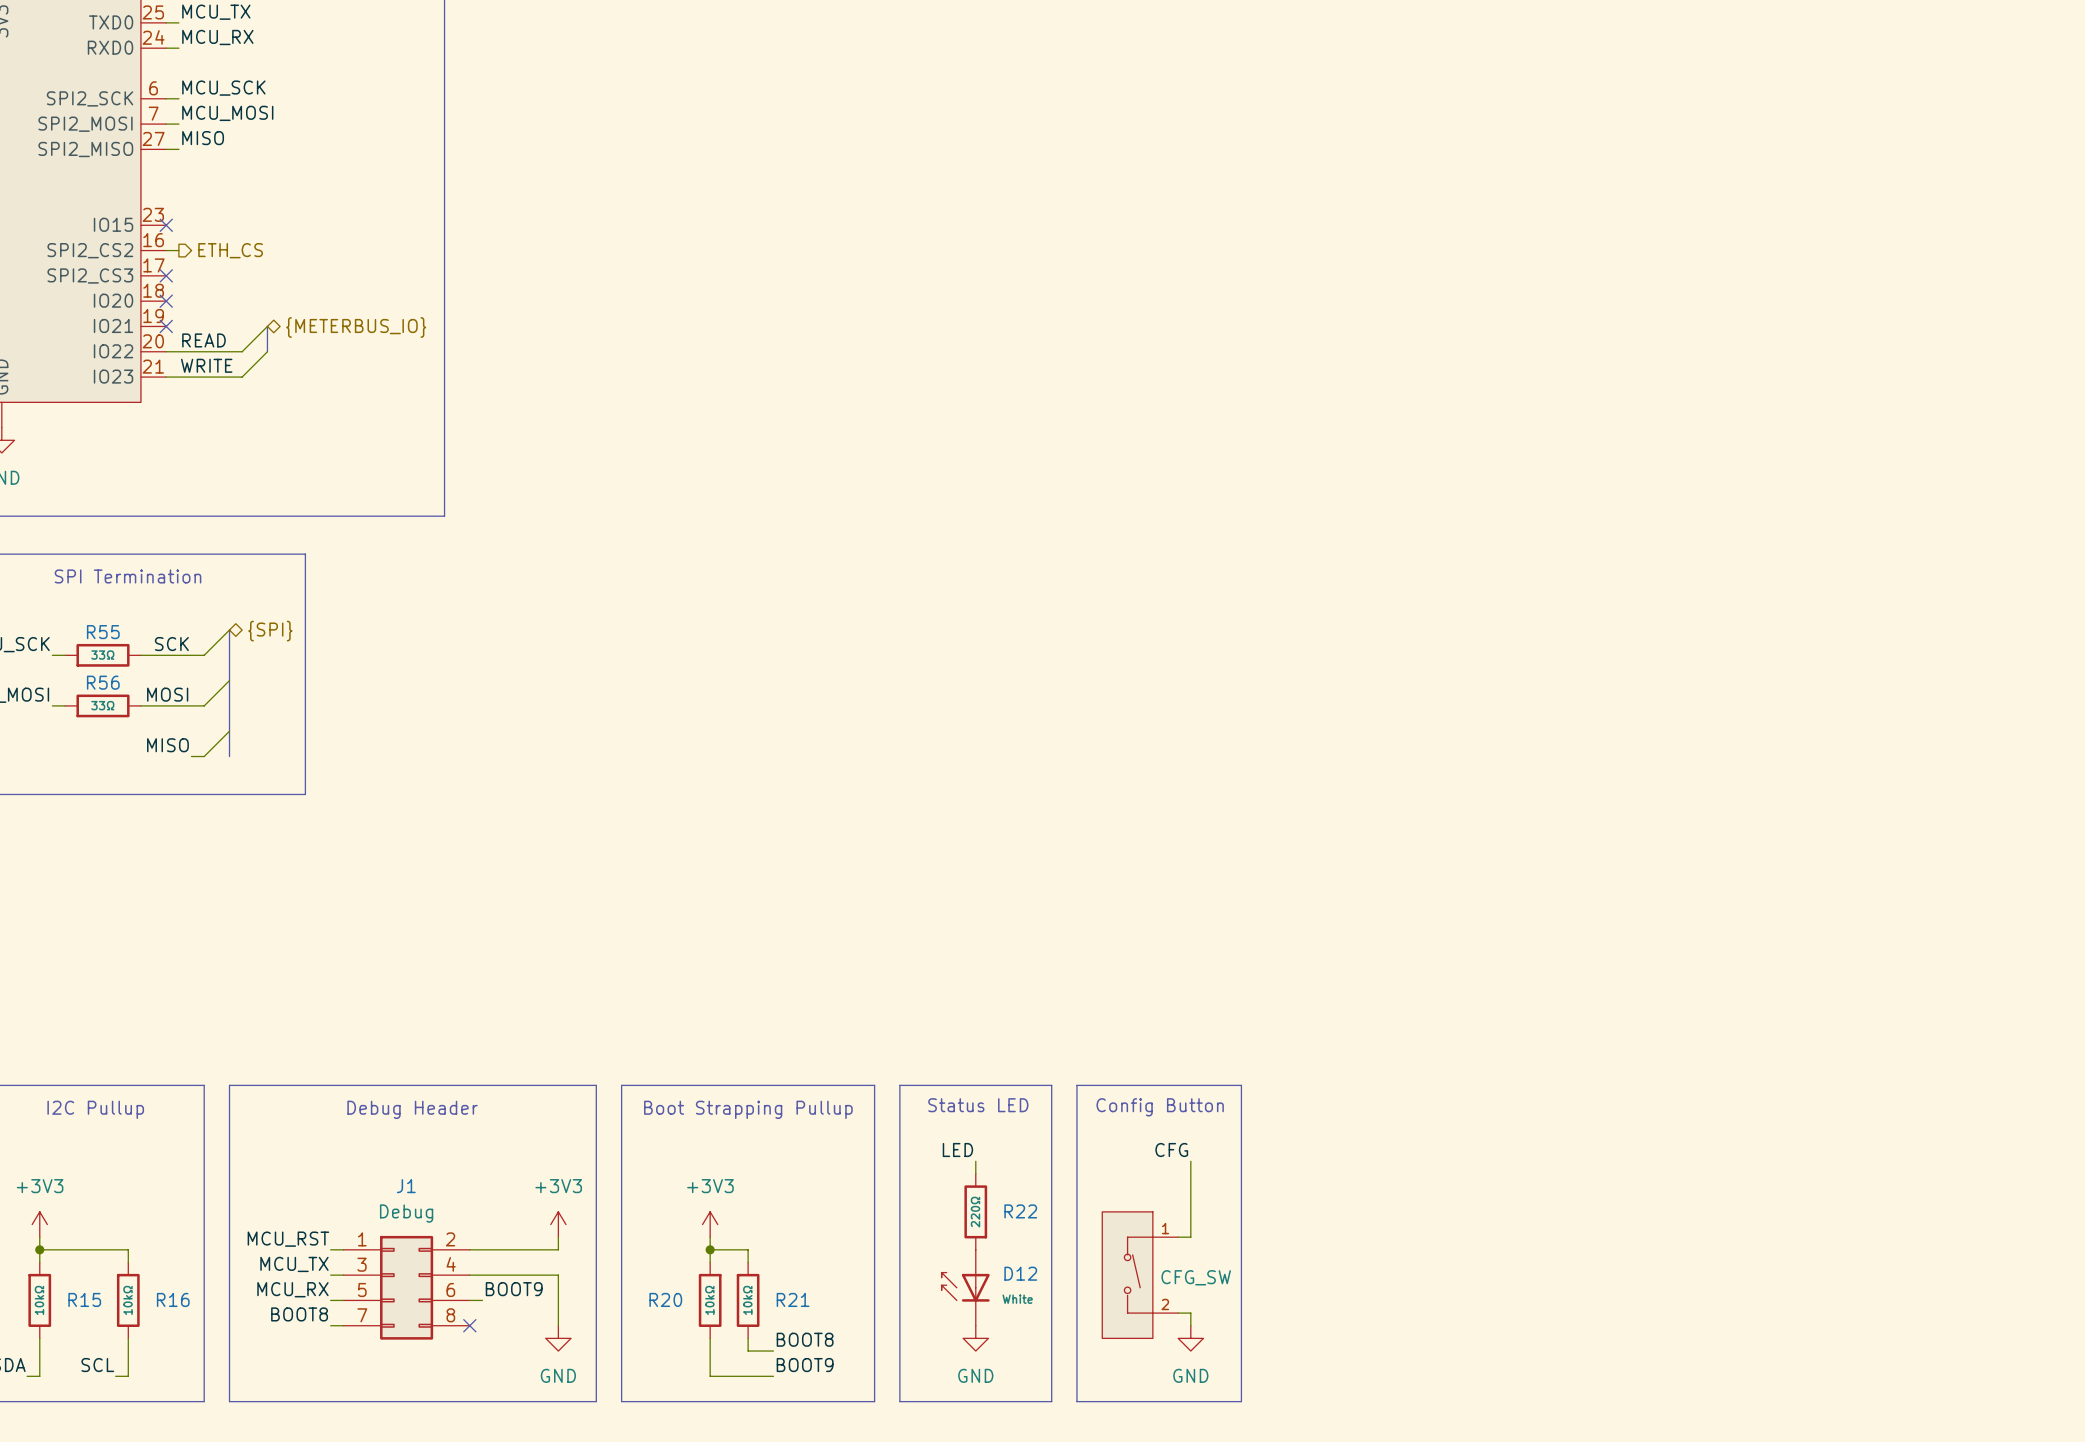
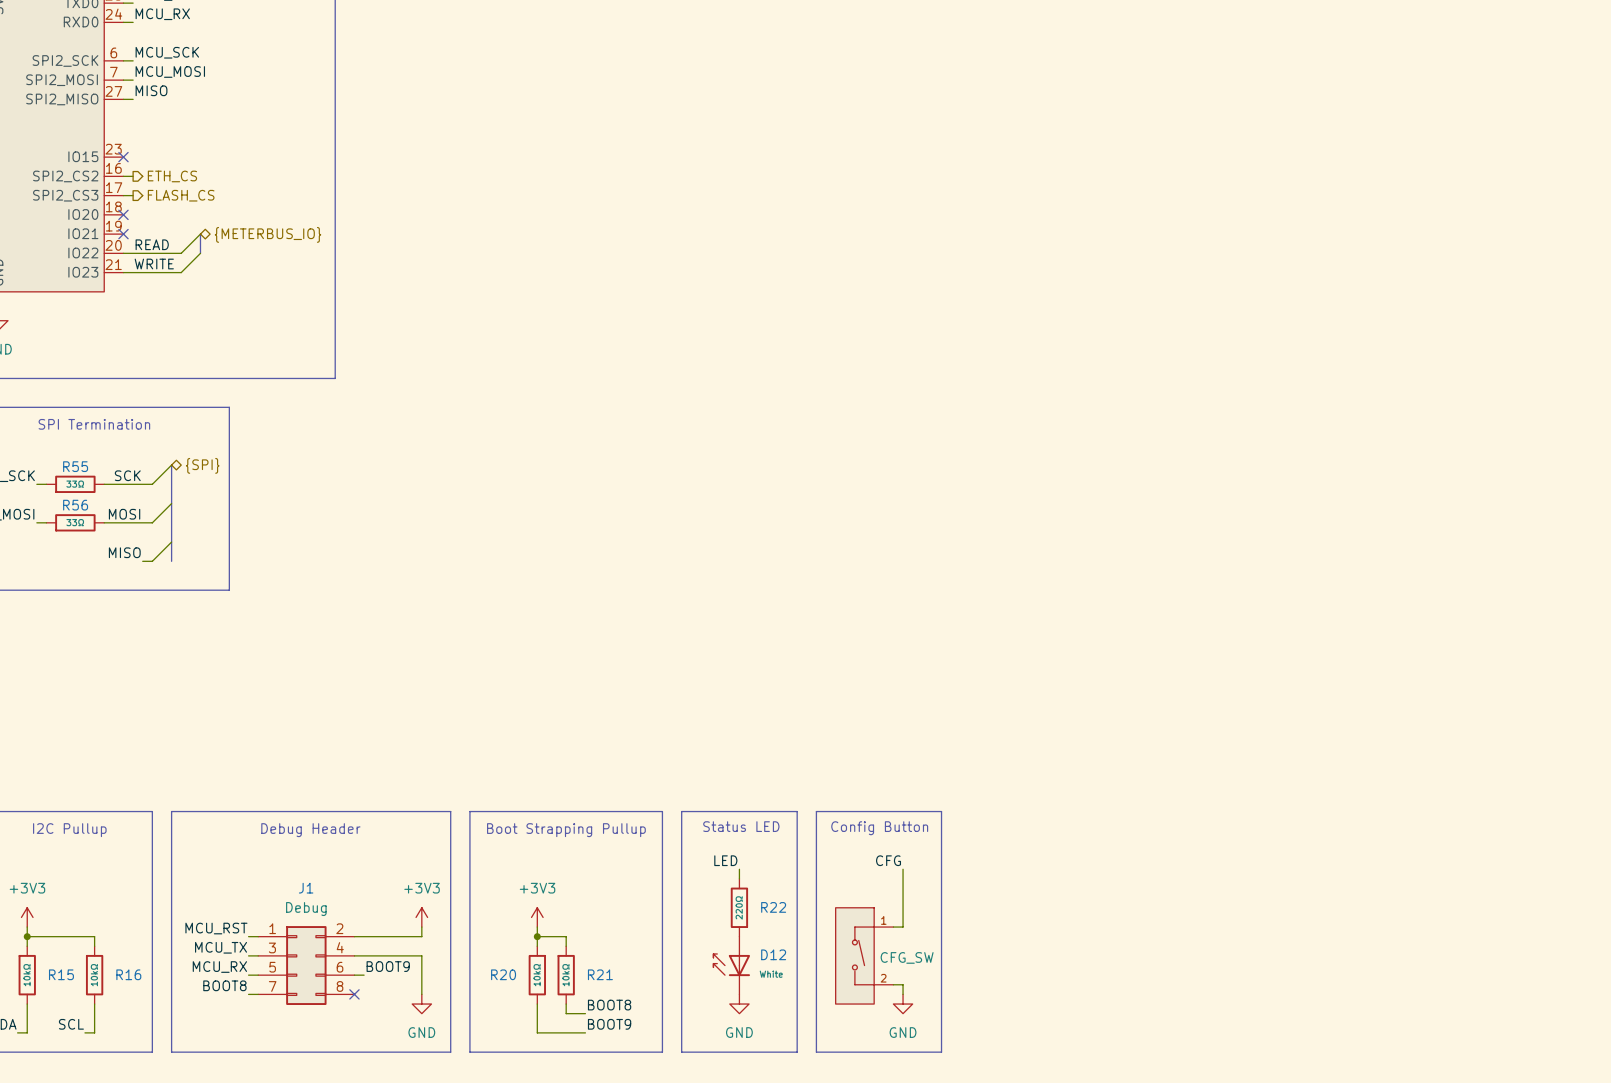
wire: none -> (123, 195) (133, 195)
no-connect mark: (166, 275) -> none
hierarchical label: none -> FLASH_CS (181, 195)

